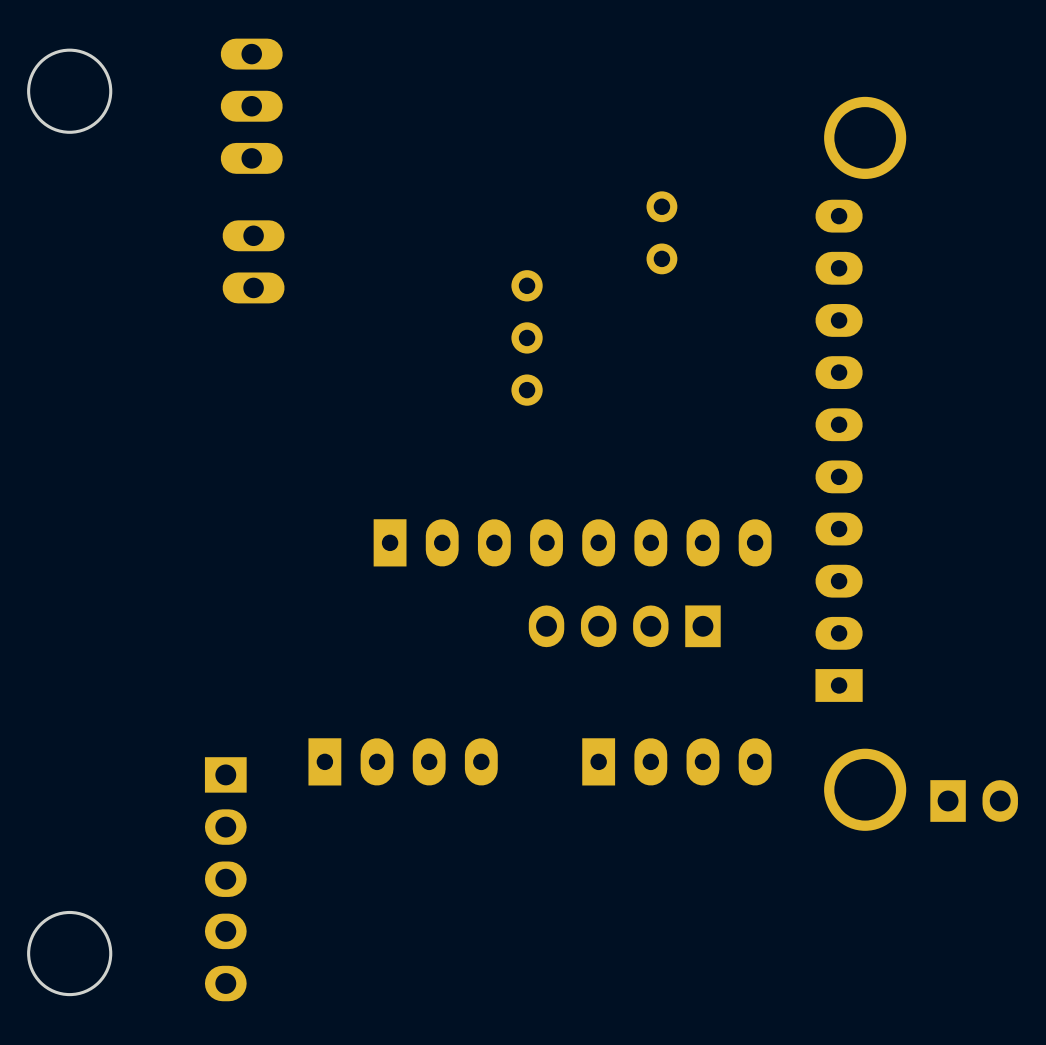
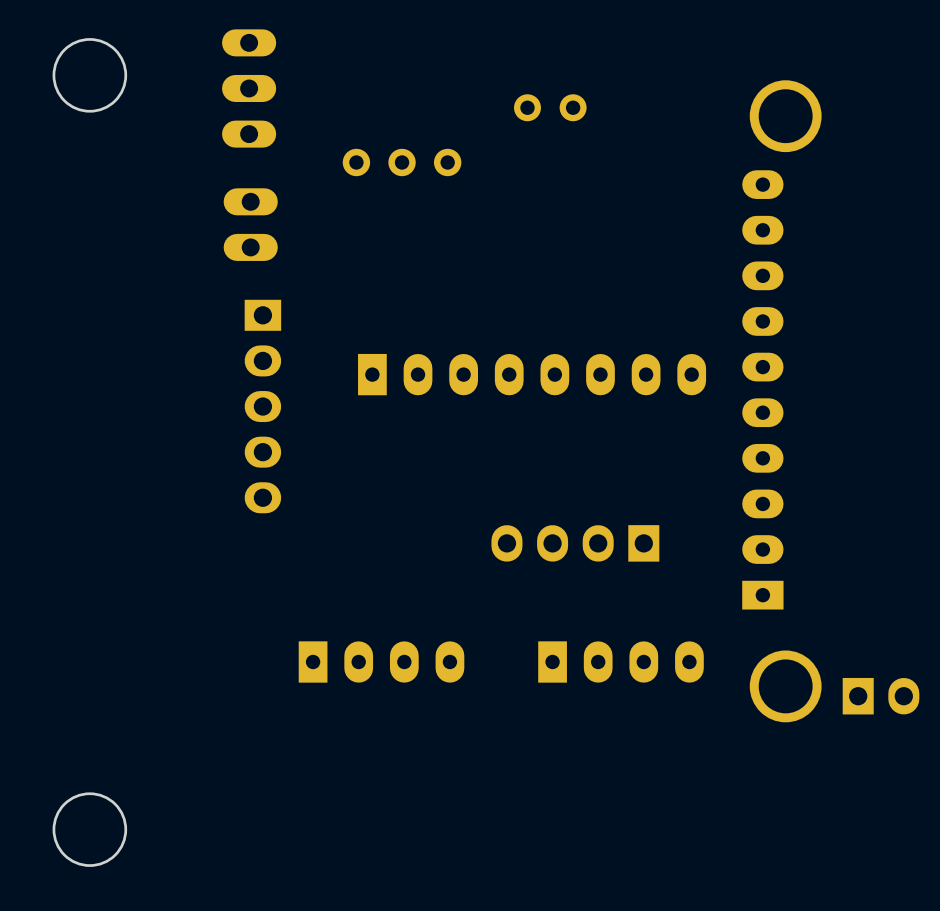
part rotation: 0° (661, 232) -> 90° clockwise (550, 107)
part position: (661, 232) -> (550, 107)
part rotation: 0° (527, 337) -> 90° clockwise (402, 162)
part position: (527, 337) -> (402, 162)
part position: (572, 542) -> (532, 374)
part position: (225, 879) -> (262, 406)

